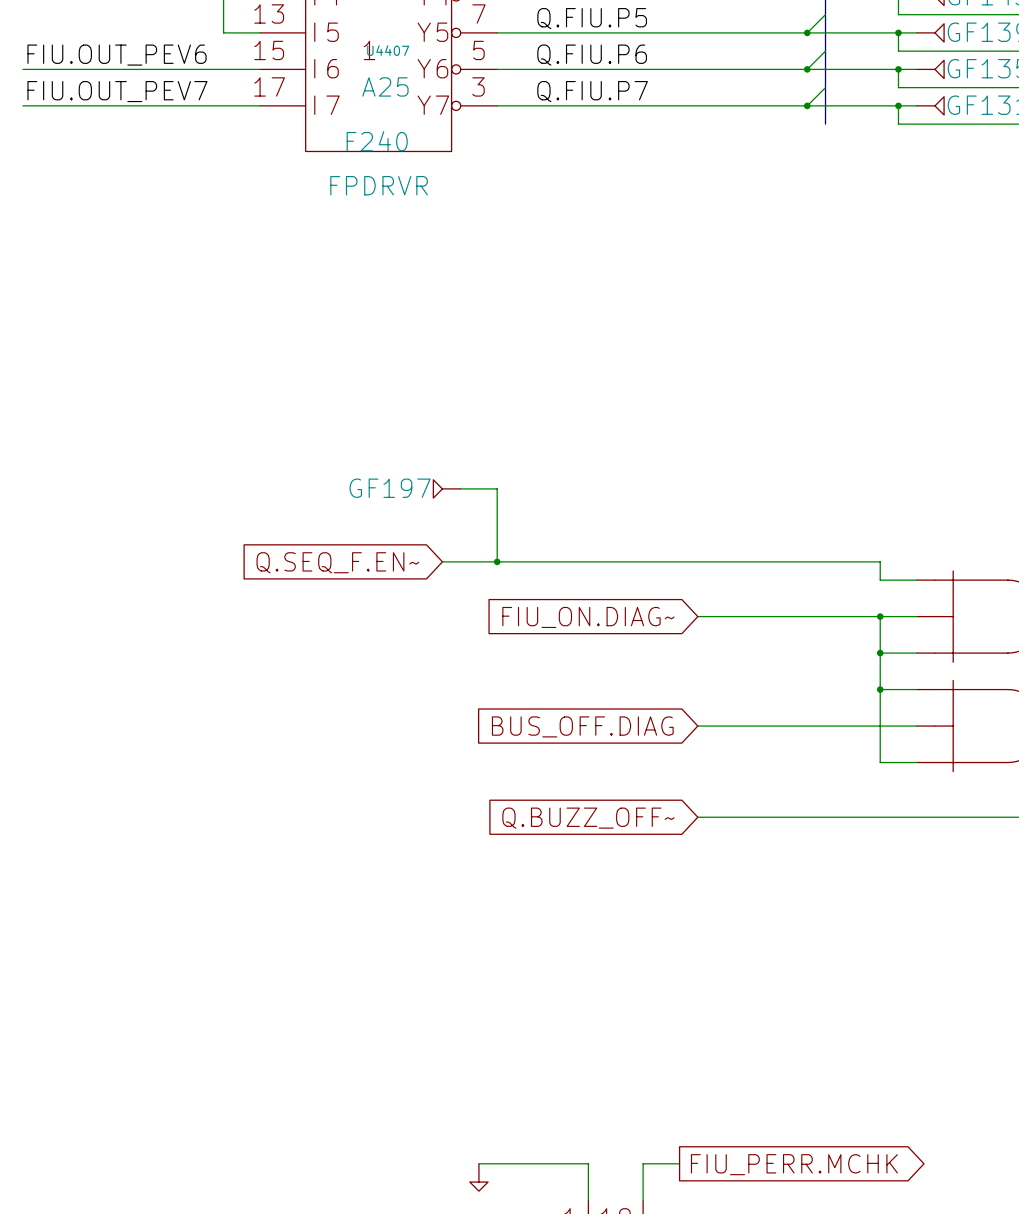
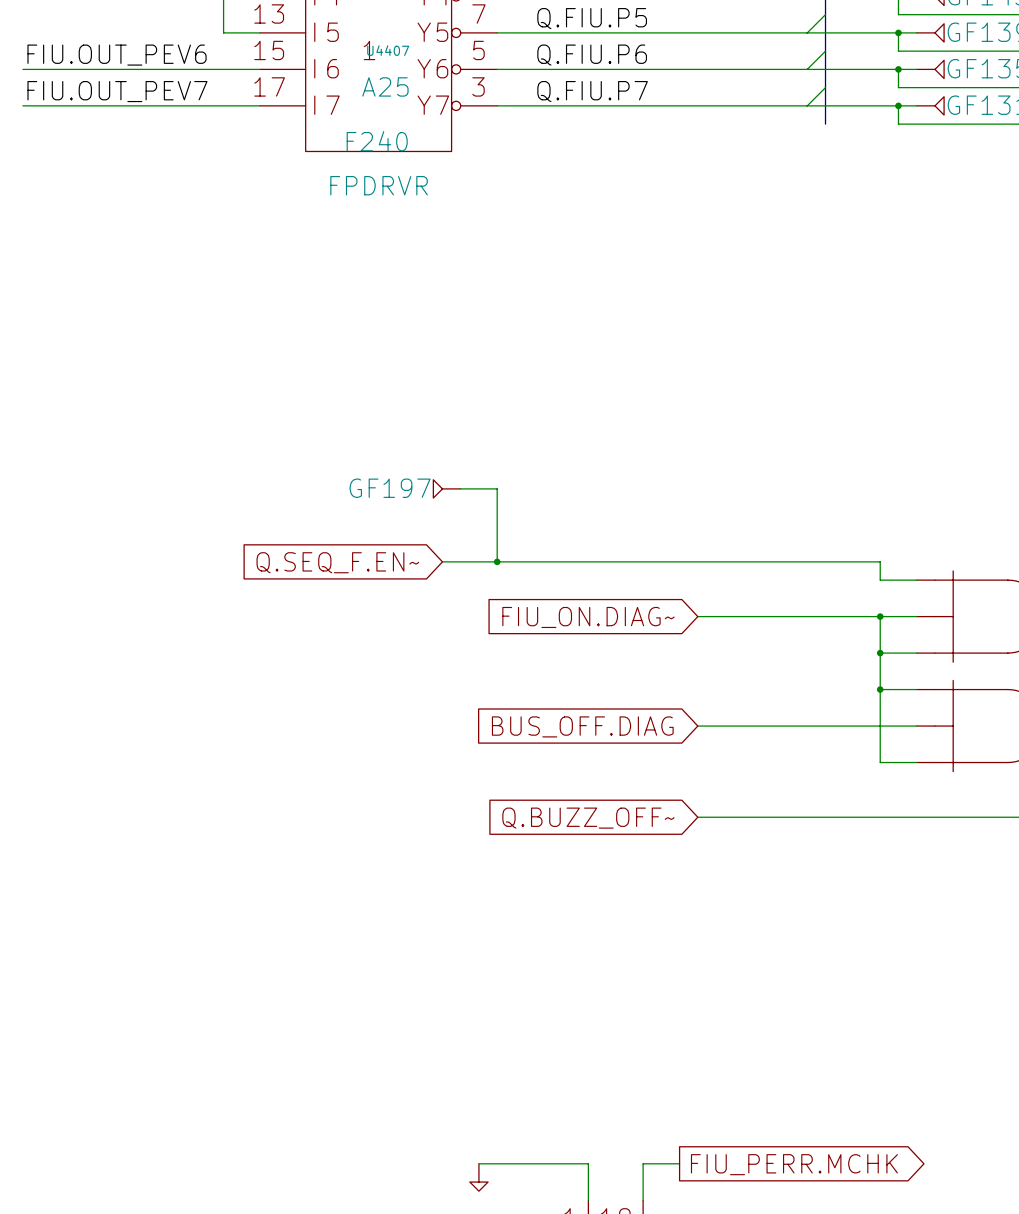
junction: (807, 32) -> none
junction: (807, 69) -> none
junction: (807, 105) -> none

